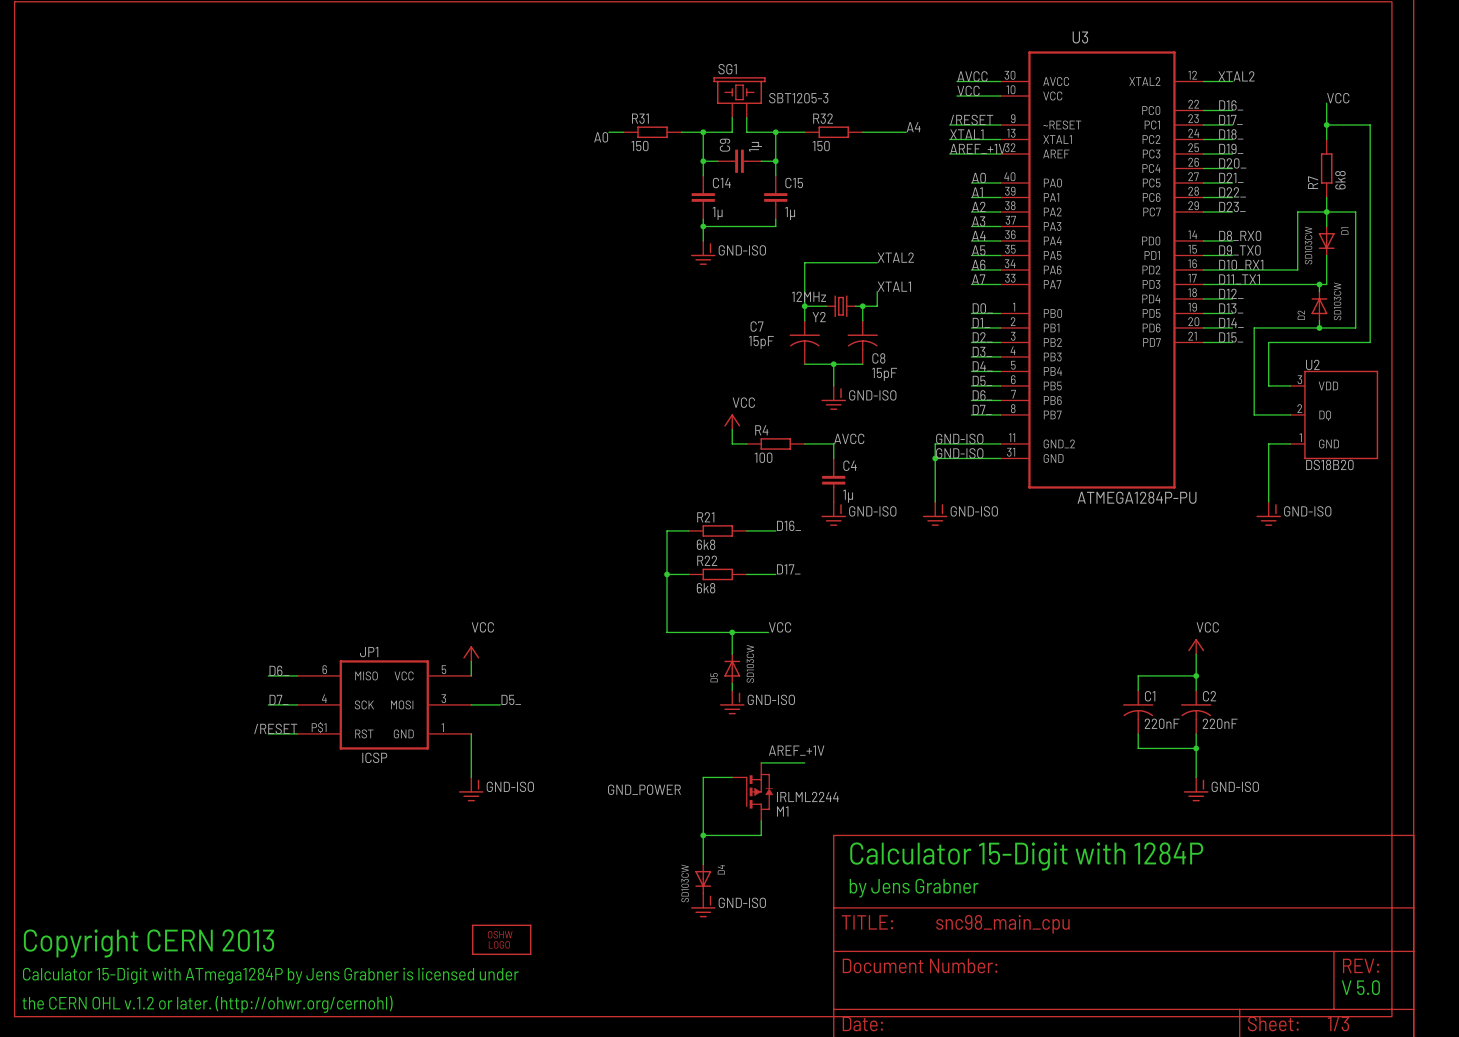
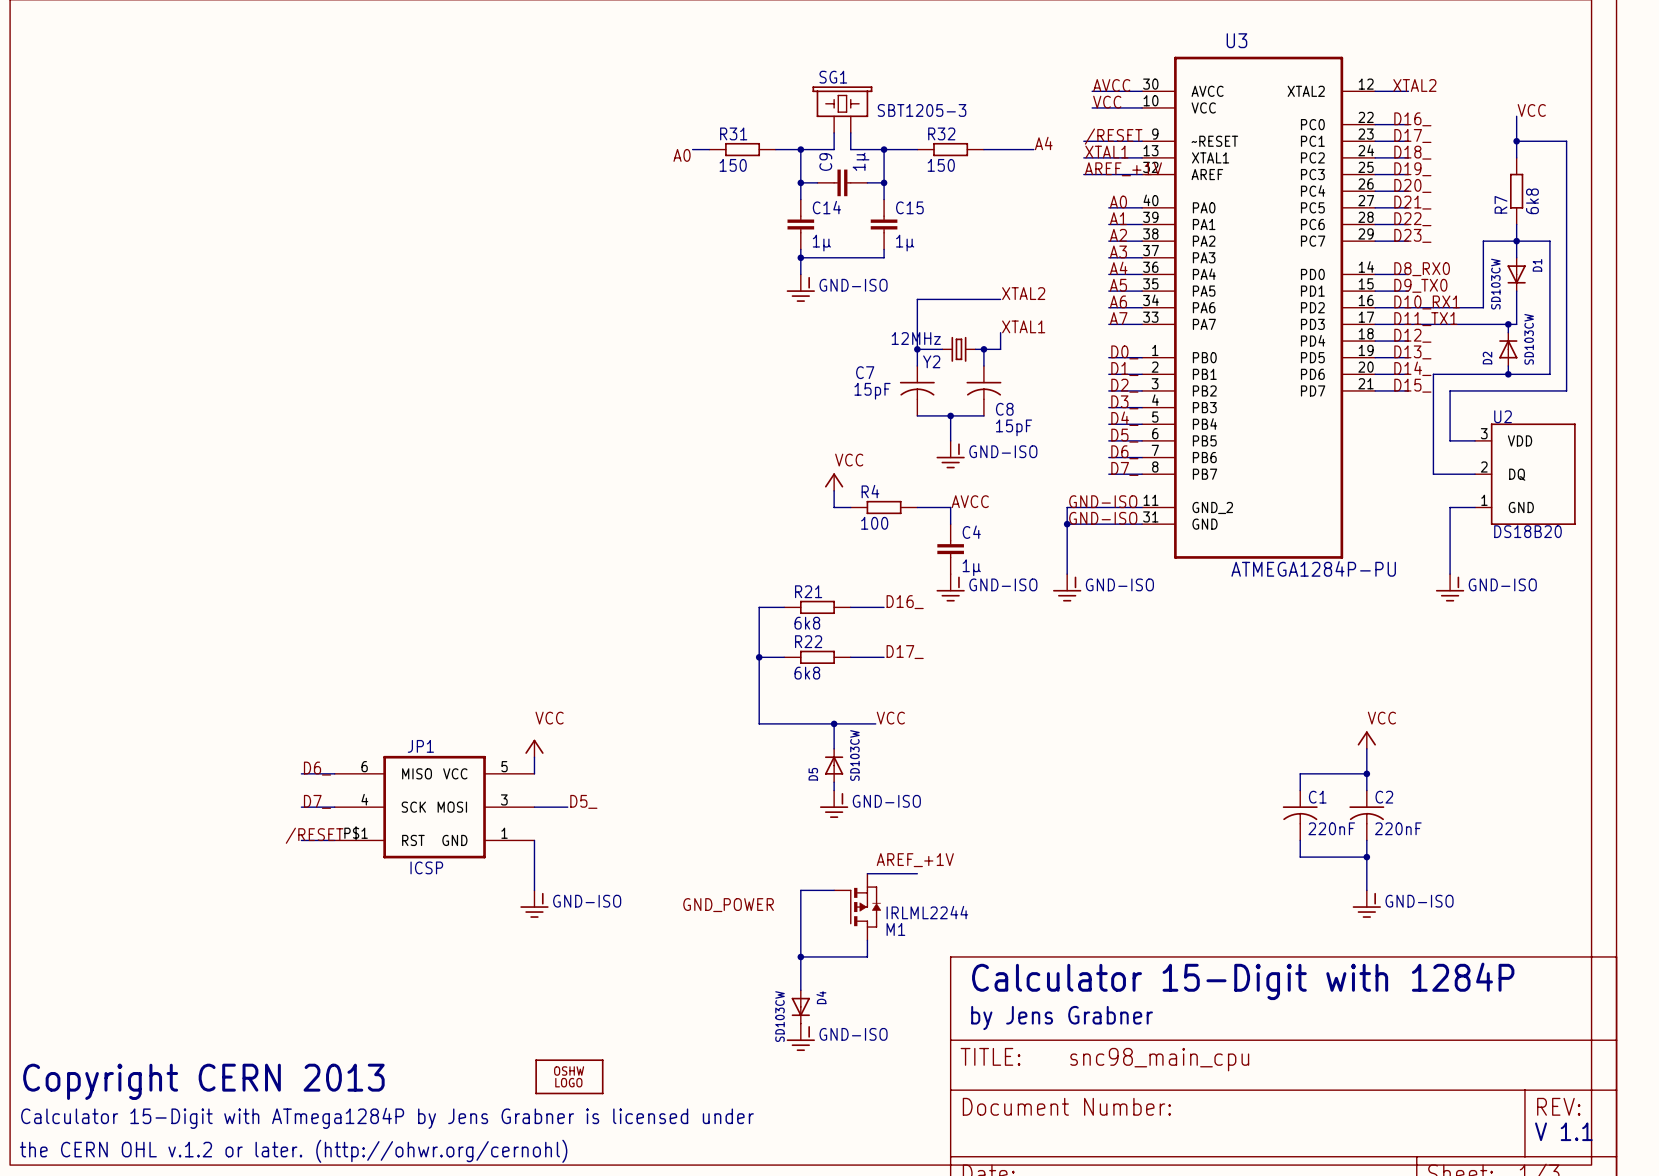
text: V 5.0 (1360, 987) -> V 1.1 (1563, 1131)

